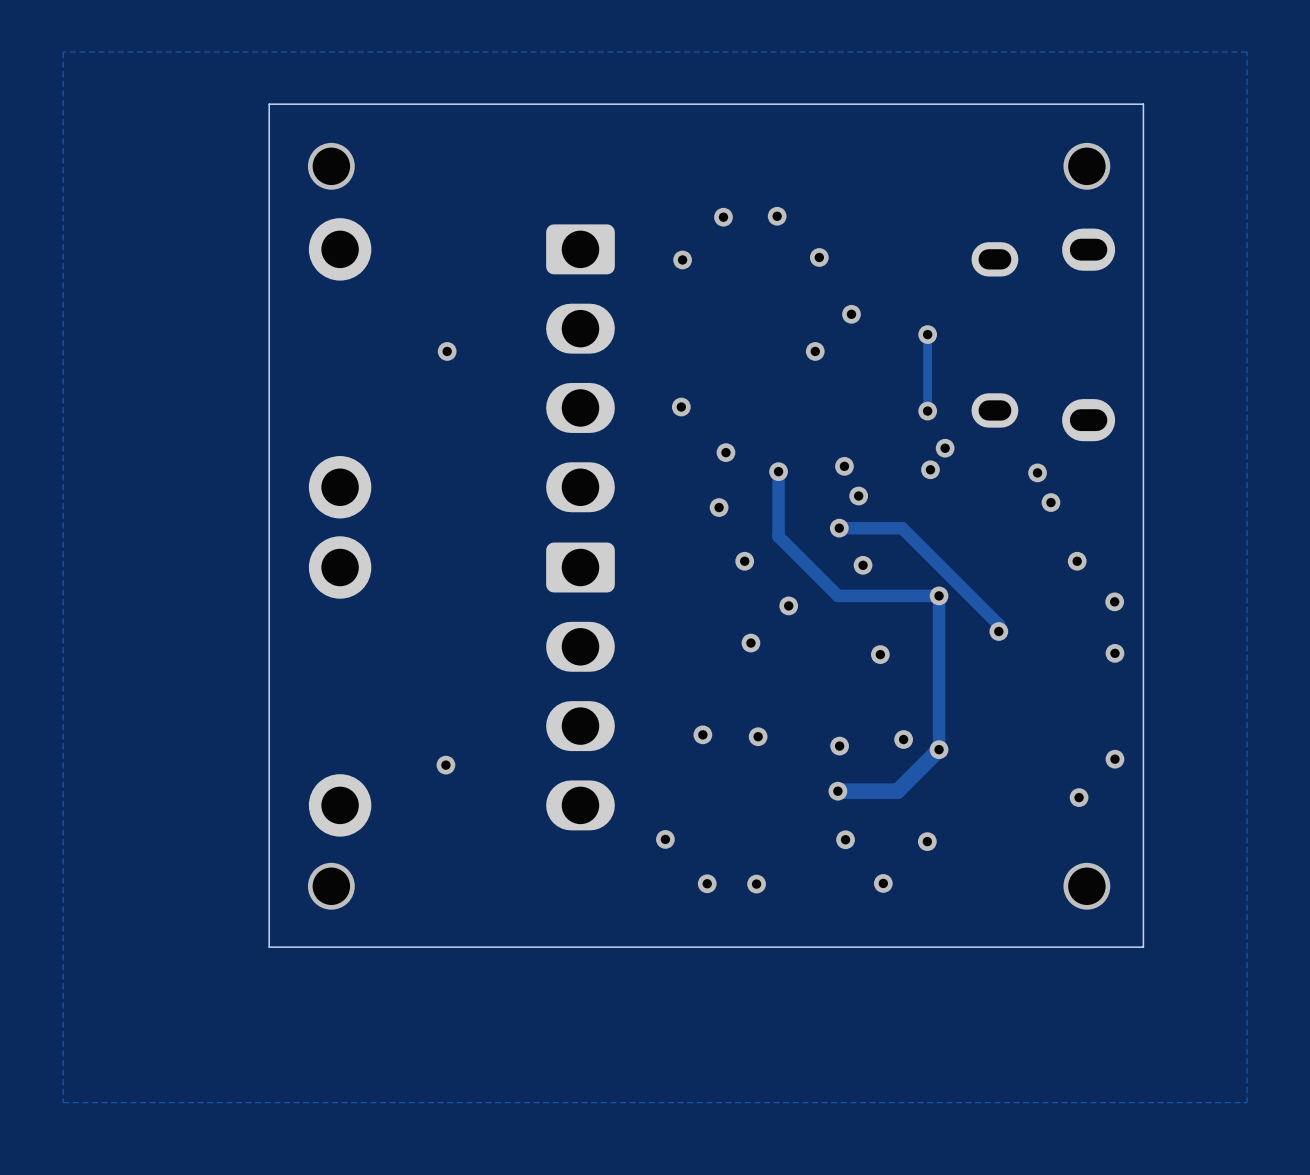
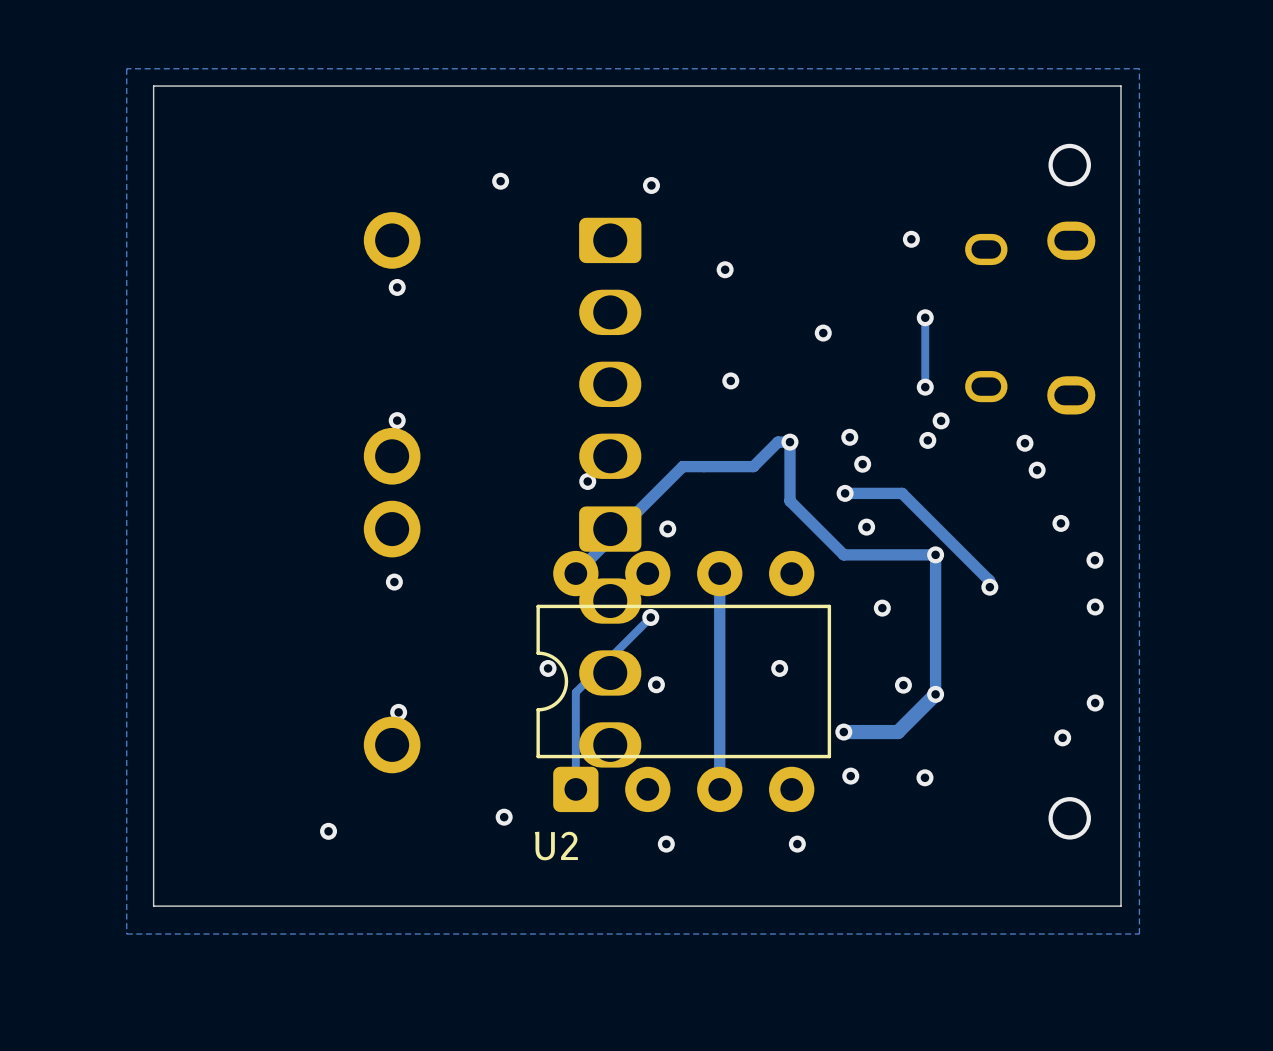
zone outline: (1247, 52) (63, 52) (63, 1102) (1247, 1102) (1247, 52) -> (1139, 68) (1139, 934) (126, 934) (126, 68) (1139, 68)
board edge: (1143, 104) (269, 104) (269, 947) (1143, 947) -> (1121, 108) (1121, 86) (153, 86) (153, 906) (1121, 906) (1121, 873)
via: (331, 166) -> none
via: none -> (500, 181)
via: none -> (651, 185)
via: (777, 216) -> none
via: (723, 217) -> none
via: none -> (911, 239)
via: (819, 257) -> none
via position: (682, 259) -> (725, 269)
via: none -> (397, 287)
via: (851, 314) -> none
via: (447, 351) -> none
via: none -> (730, 380)
via: (681, 407) -> none
via: none -> (397, 420)
via: (725, 452) -> none
track: none -> (790, 442) (777, 442) (753, 466) (682, 466) (575, 573)
via: (719, 507) -> none
via: none -> (587, 481)
via: (744, 561) -> none
via: none -> (667, 528)
via: (788, 605) -> none
track: none -> (719, 573) (719, 789)
via: none -> (394, 582)
via: (750, 643) -> none
track: none -> (650, 617) (575, 692) (575, 789)
via: none -> (650, 617)
via: none -> (548, 668)
via: (702, 734) -> none
U2: none -> (683, 681)
via position: (758, 736) -> (779, 668)
via: none -> (656, 684)
via: (839, 746) -> none
via: (445, 765) -> none
via: none -> (398, 712)
via: (665, 839) -> none
via: (707, 883) -> none
via: (883, 883) -> none
via: (756, 884) -> none
via: none -> (504, 817)
via: (331, 886) -> none
via: none -> (328, 831)
via: none -> (666, 844)
via: none -> (797, 844)

